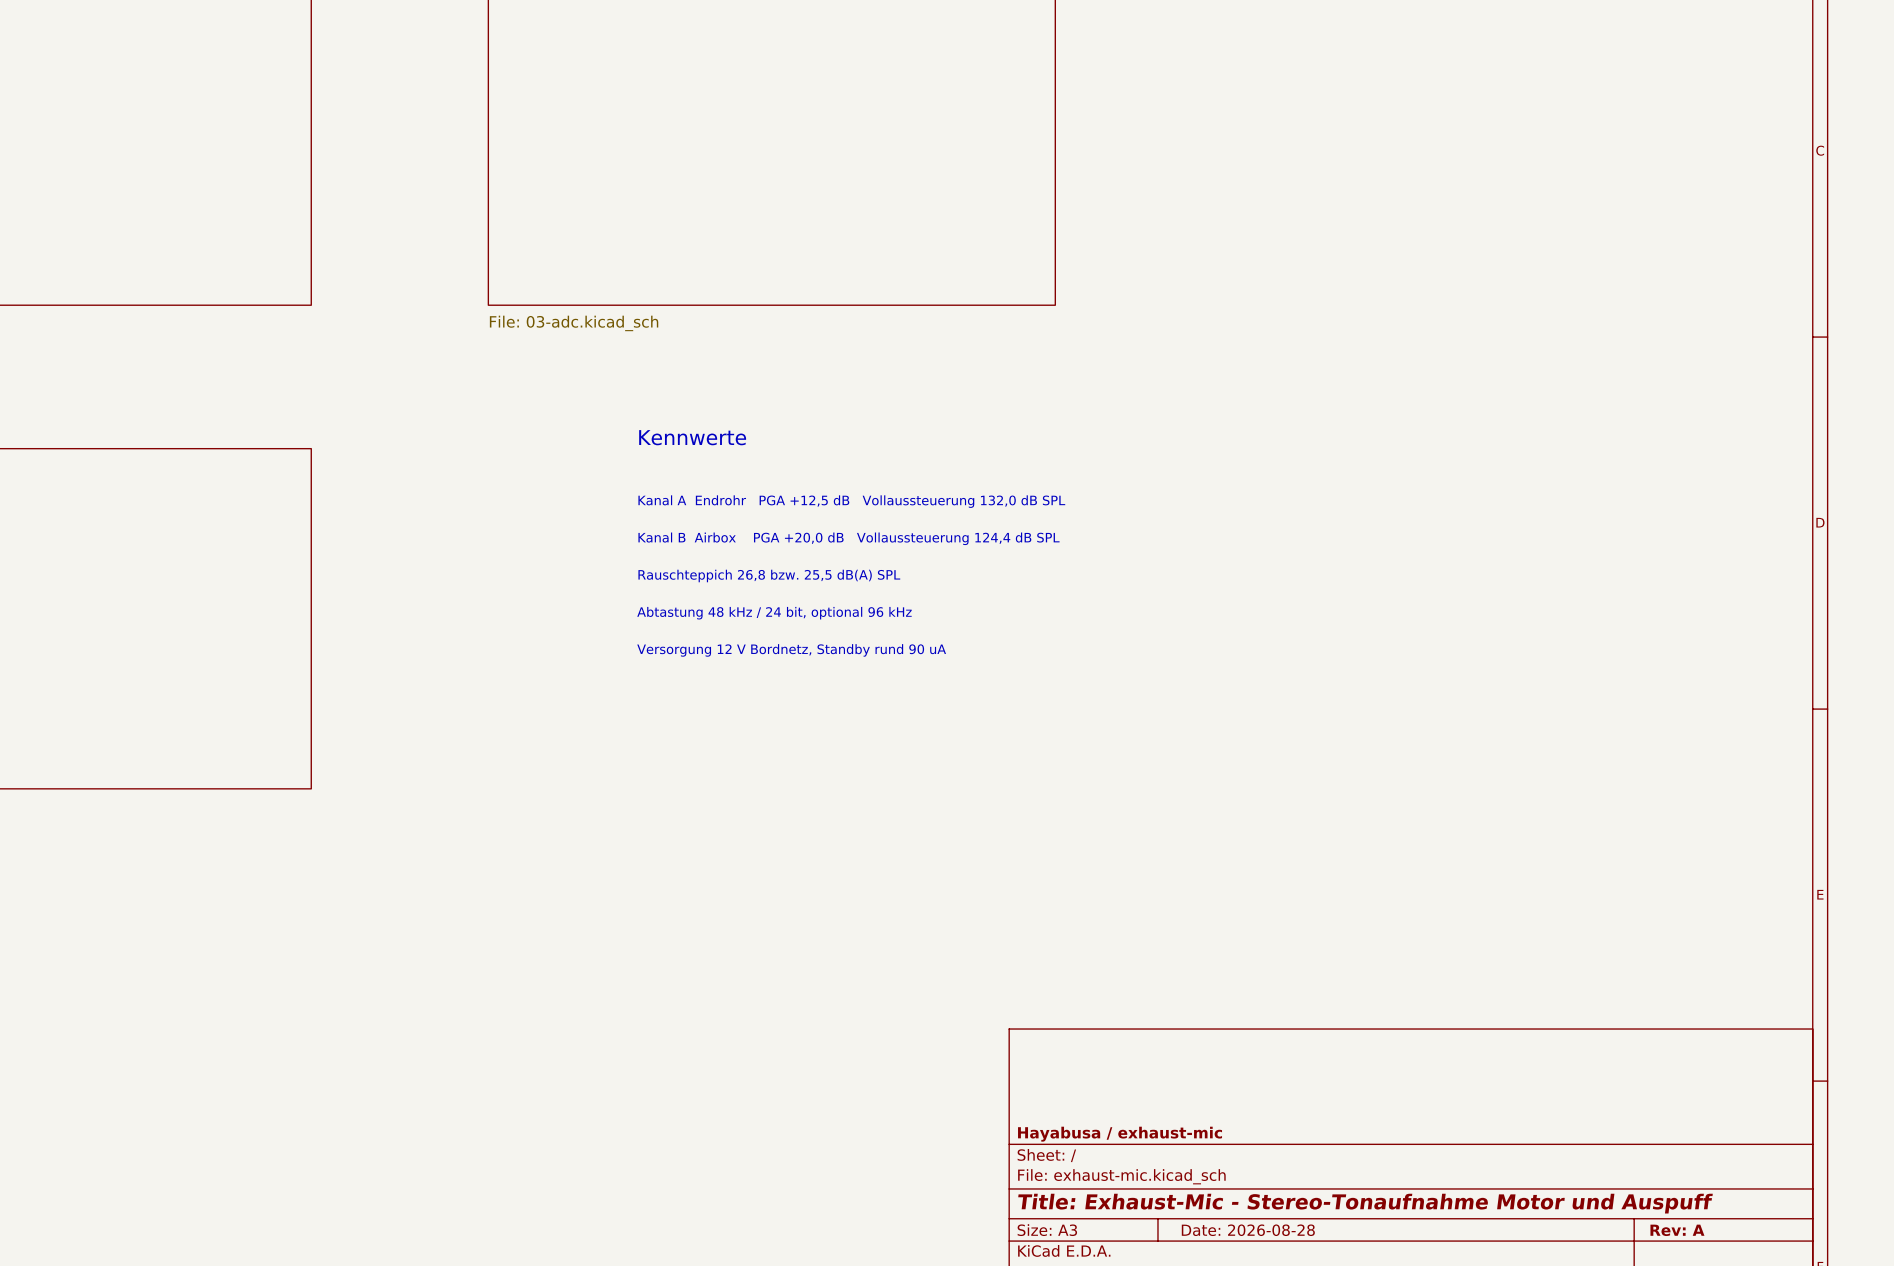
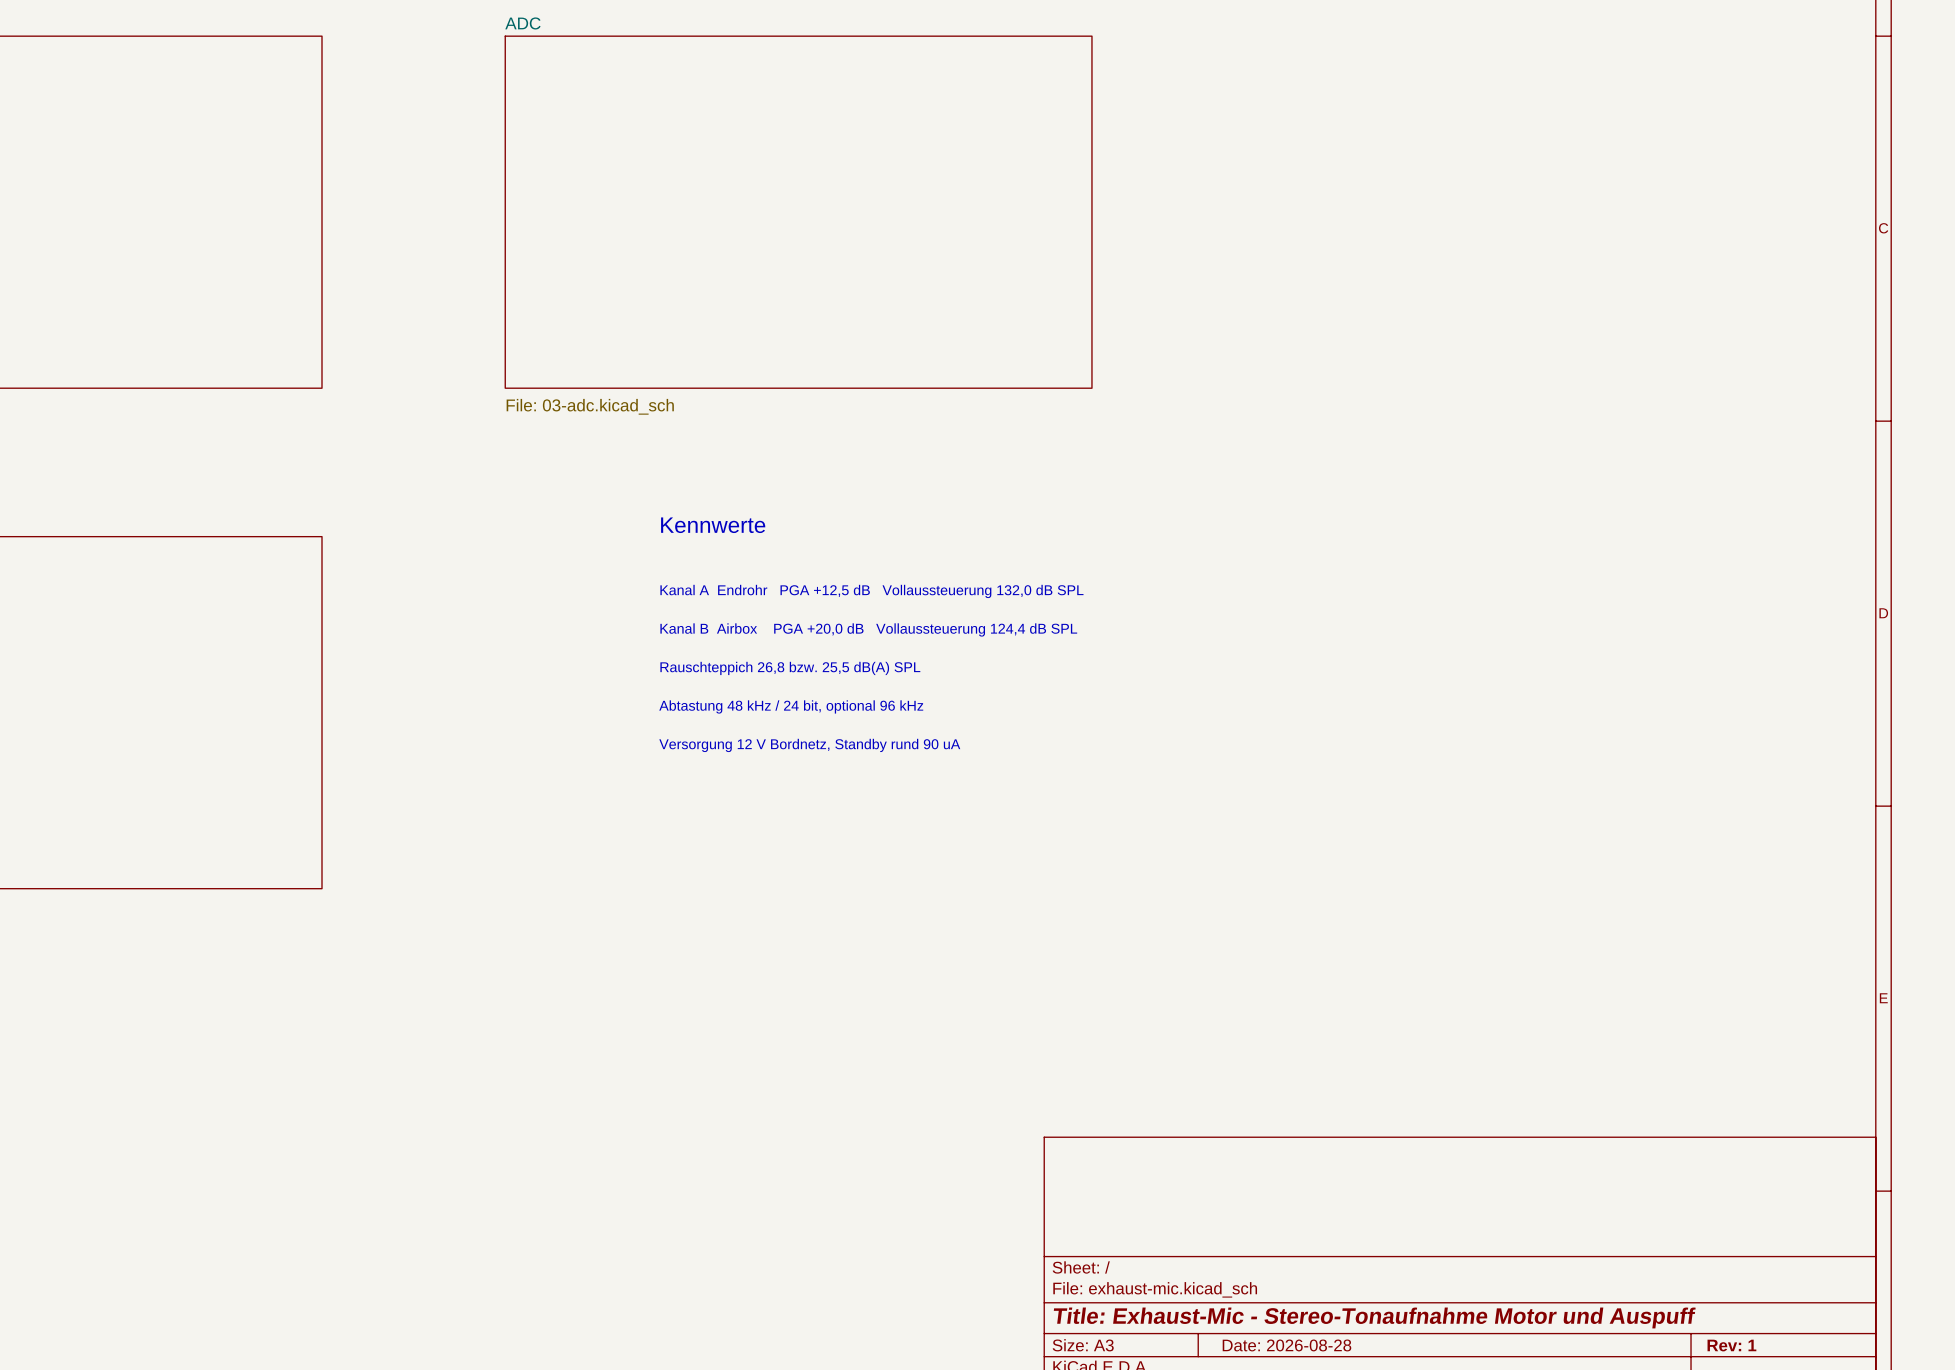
title block: Hayabusa / exhaust-mic (1120, 1134) -> none
title block: Rev: A (1677, 1230) -> Rev: 1 (1731, 1345)

